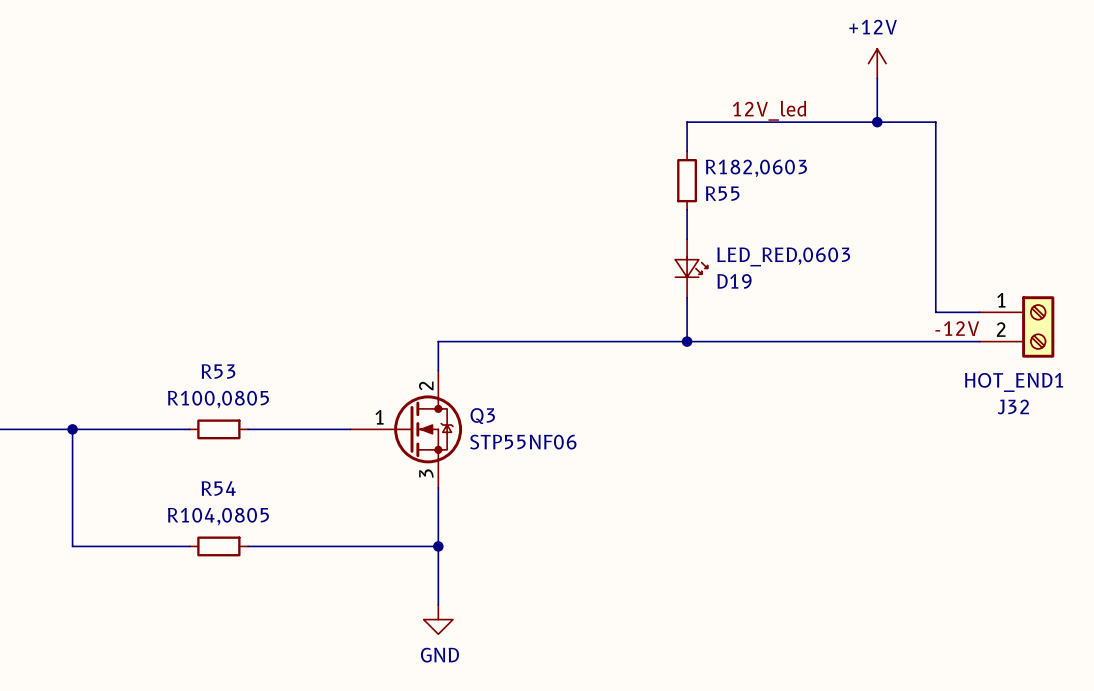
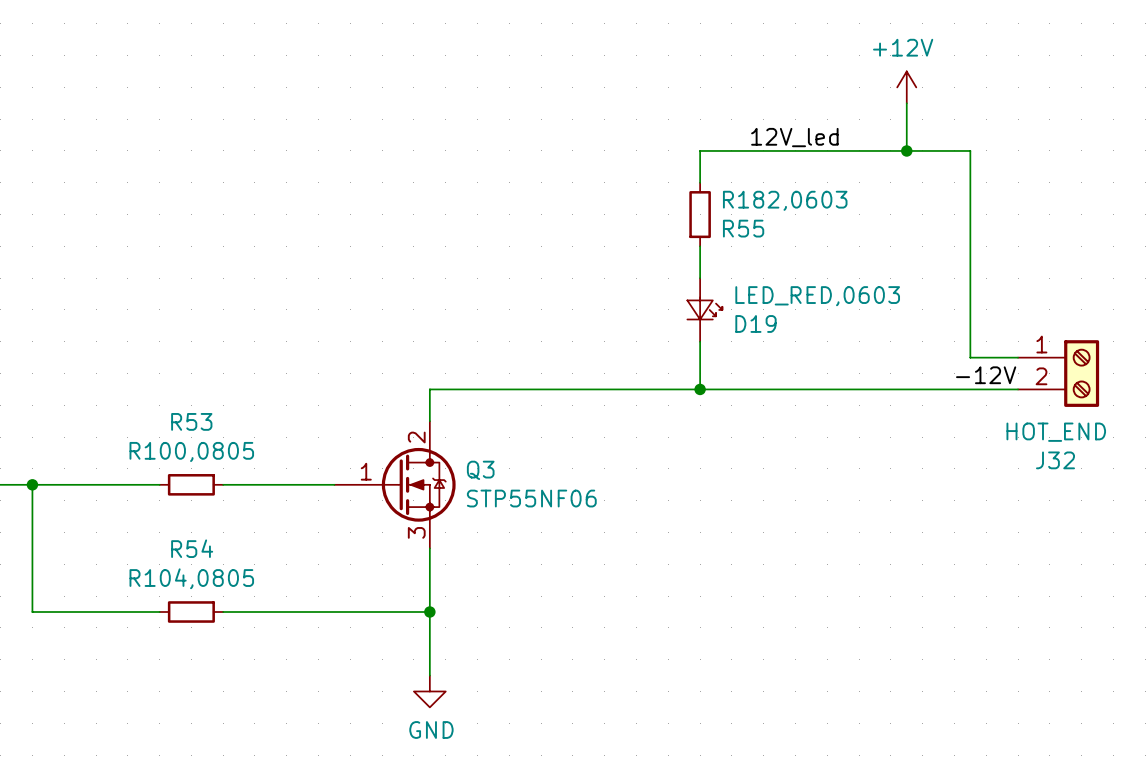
J32 value: HOT_END1 (1014, 382) -> HOT_END (1056, 432)

